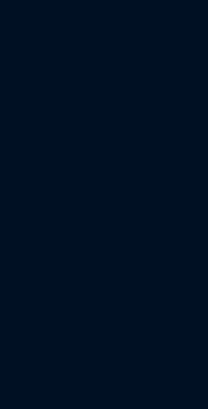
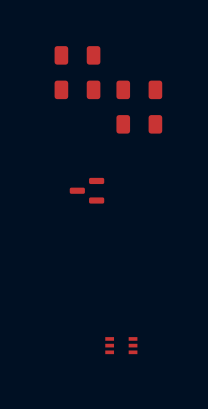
part: none -> (77, 55)
part: none -> (77, 89)
part: none -> (139, 89)
part: none -> (139, 124)
part: none -> (86, 190)
part: none -> (121, 345)

